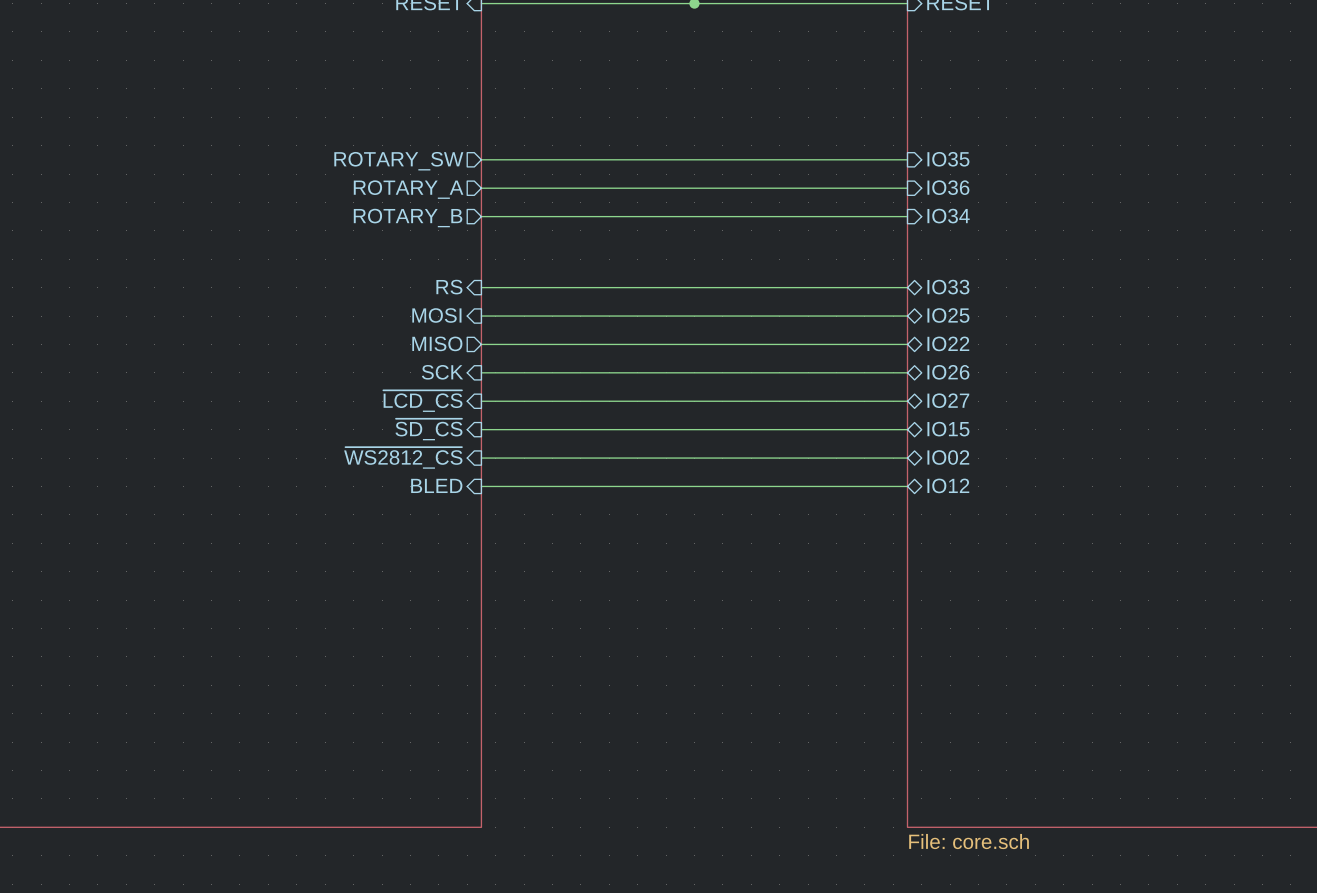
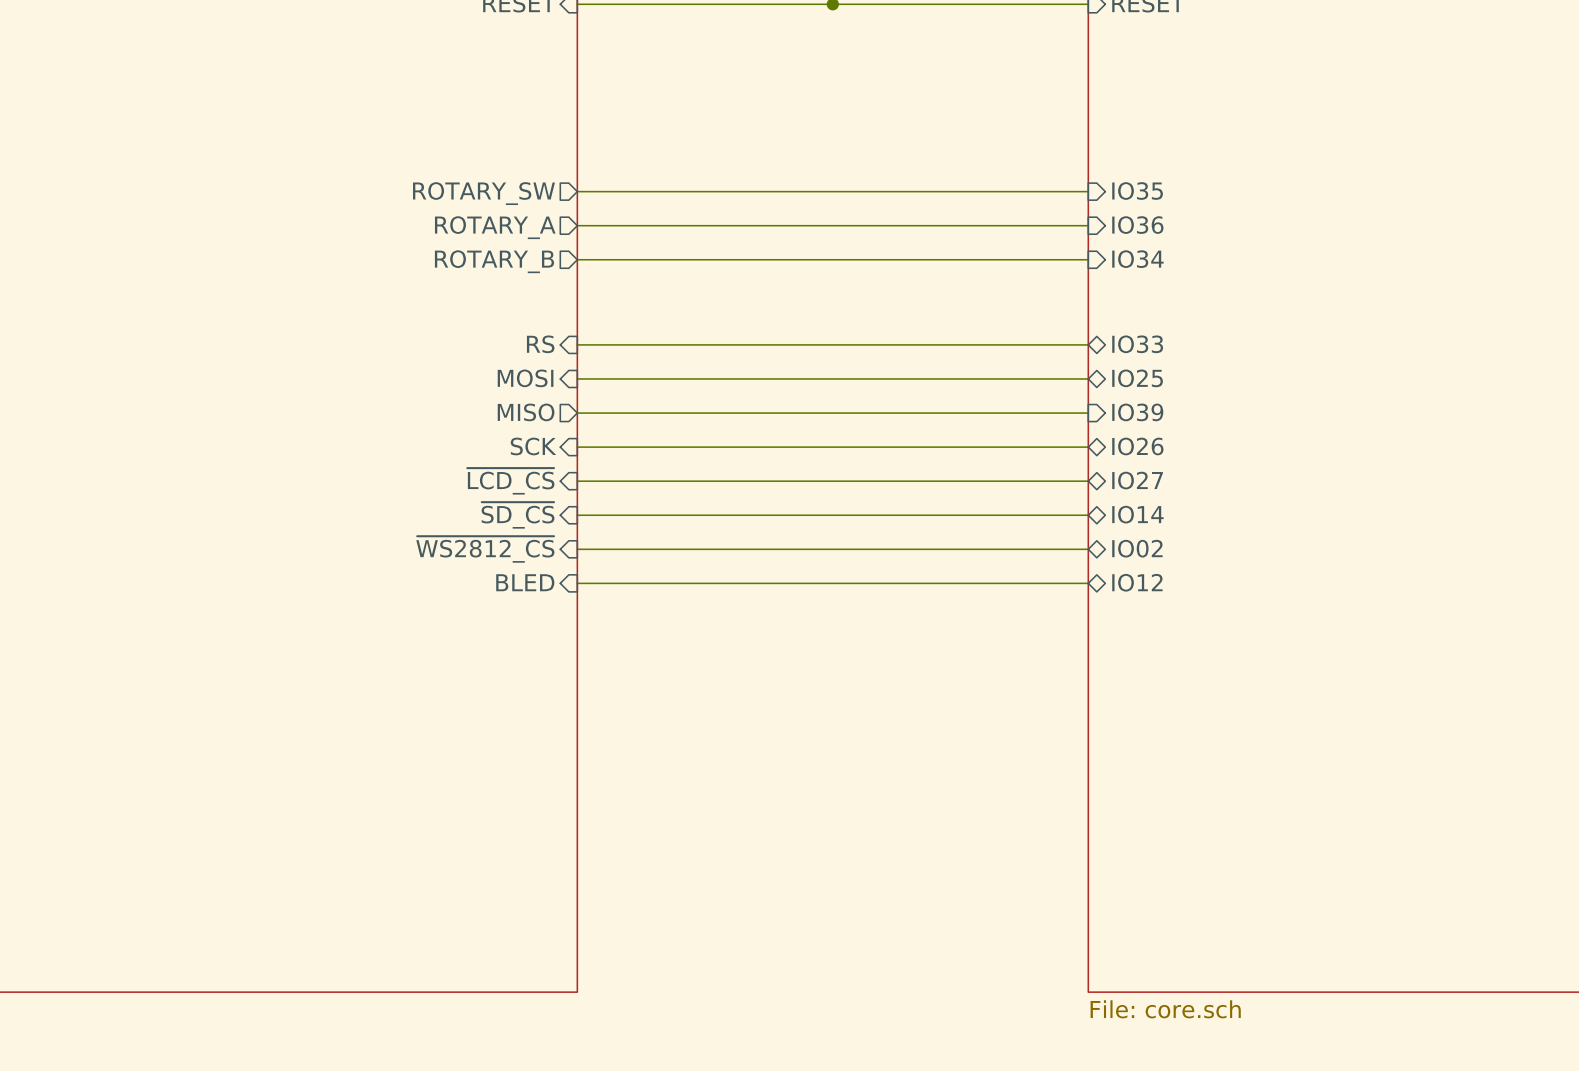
sheet pin shape: bidirectional (948, 343) -> input (1137, 412)
sheet pin: IO22 (948, 343) -> IO39 (1137, 412)
sheet pin: IO15 (948, 429) -> IO14 (1137, 514)

